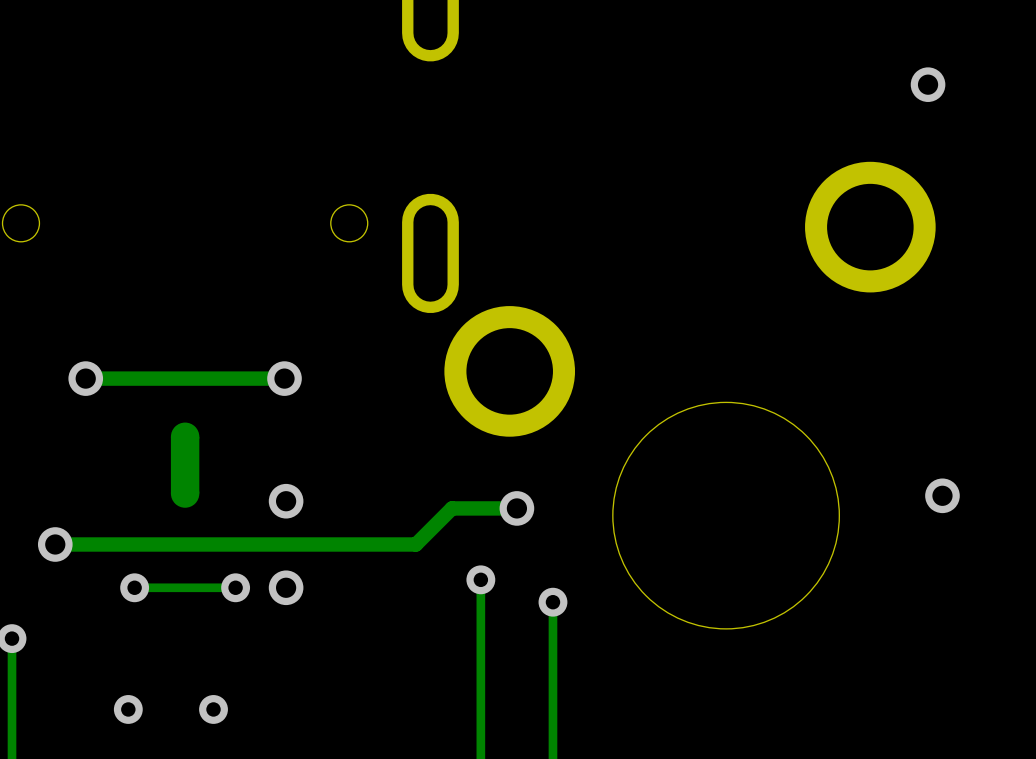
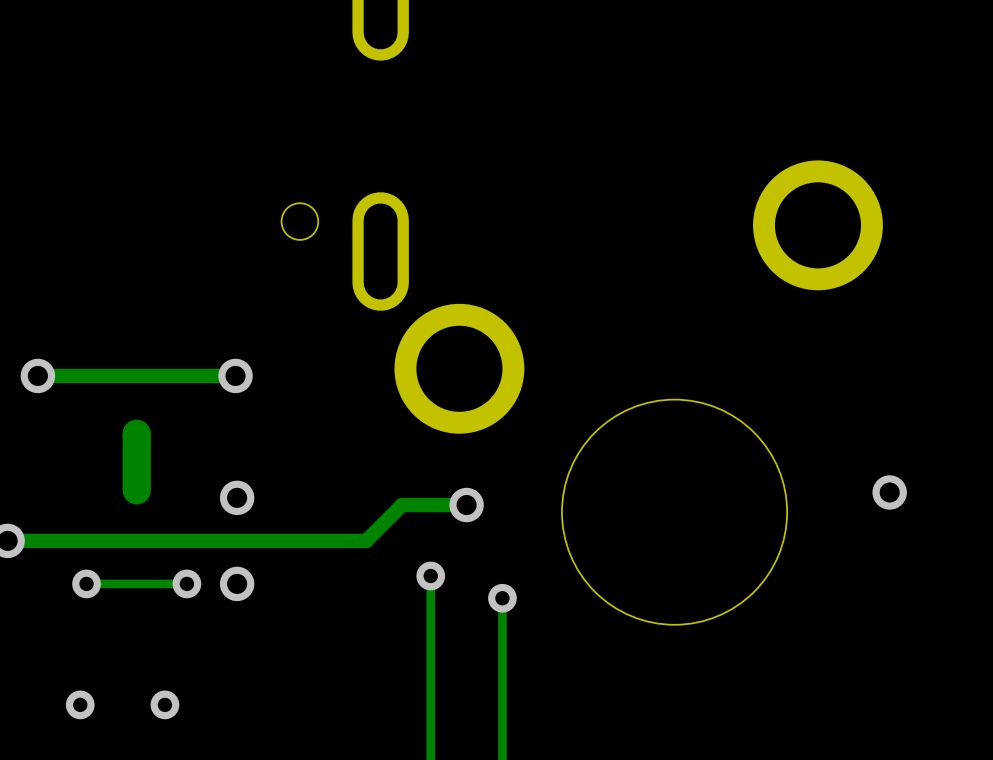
via: (928, 84) -> none

